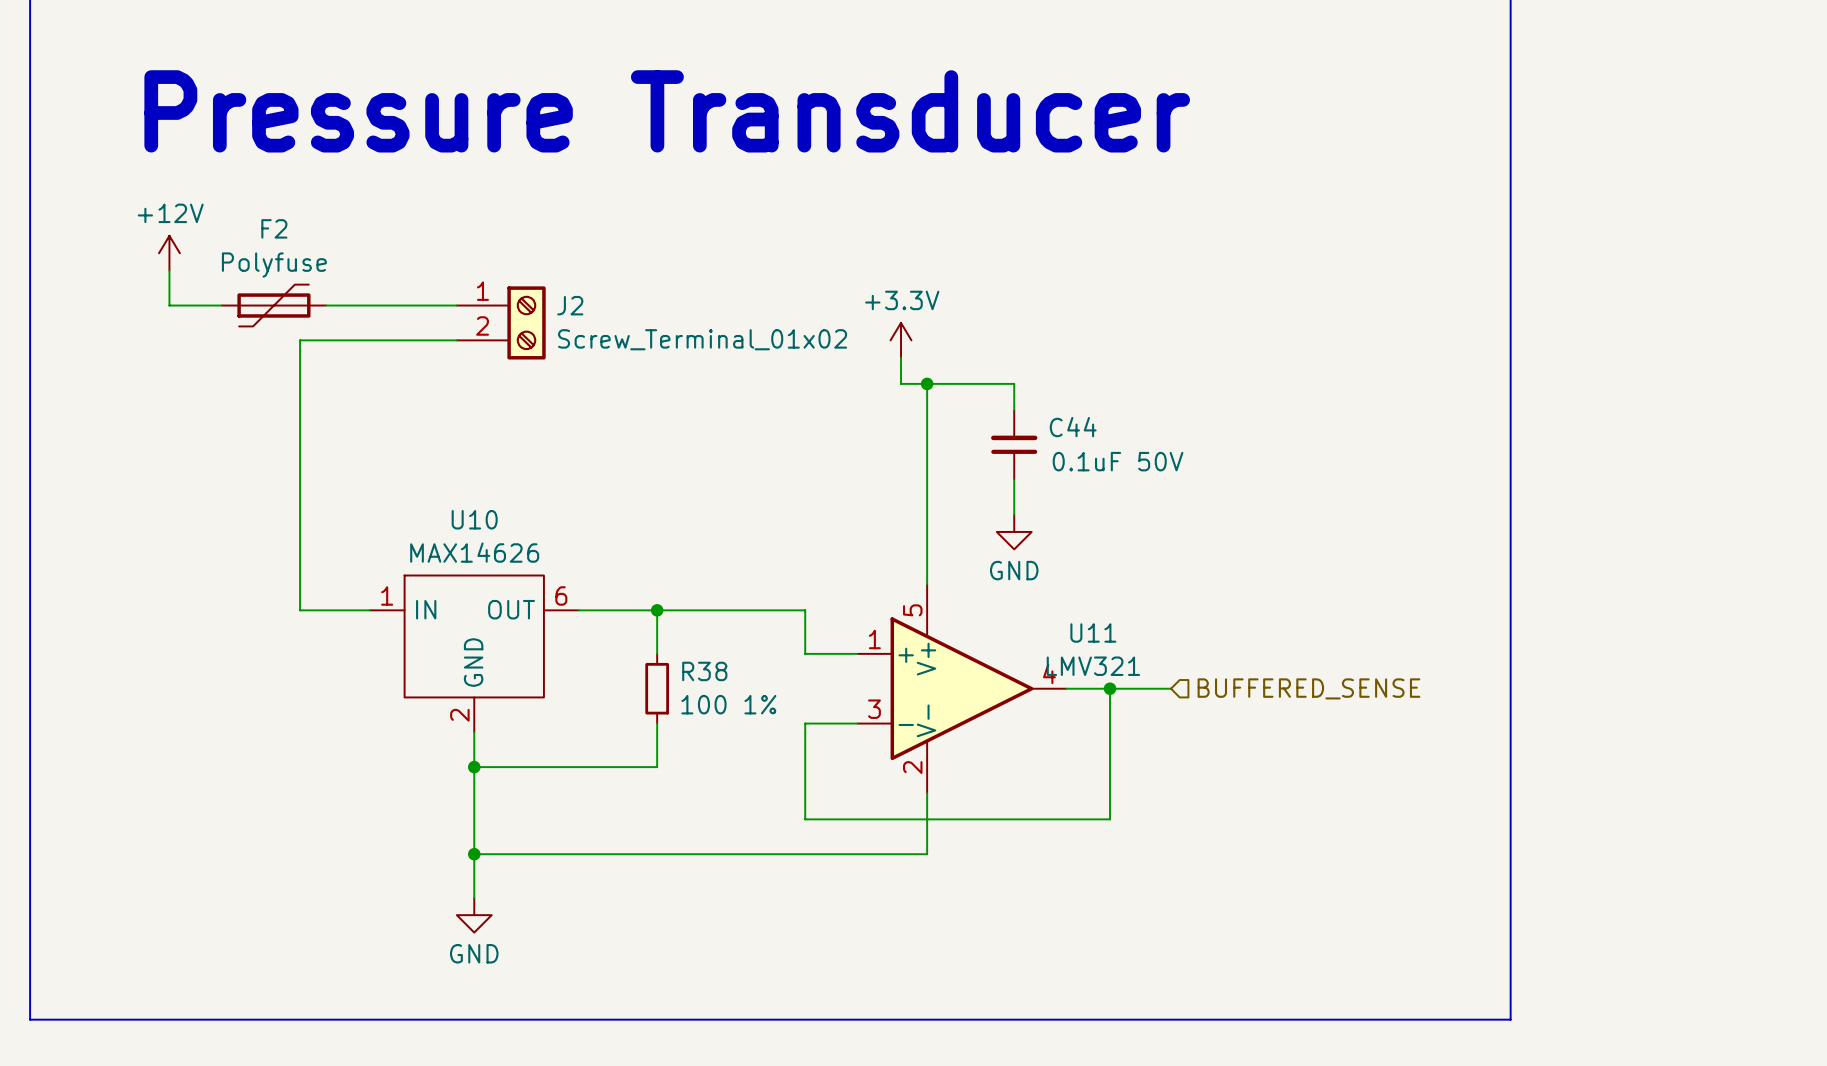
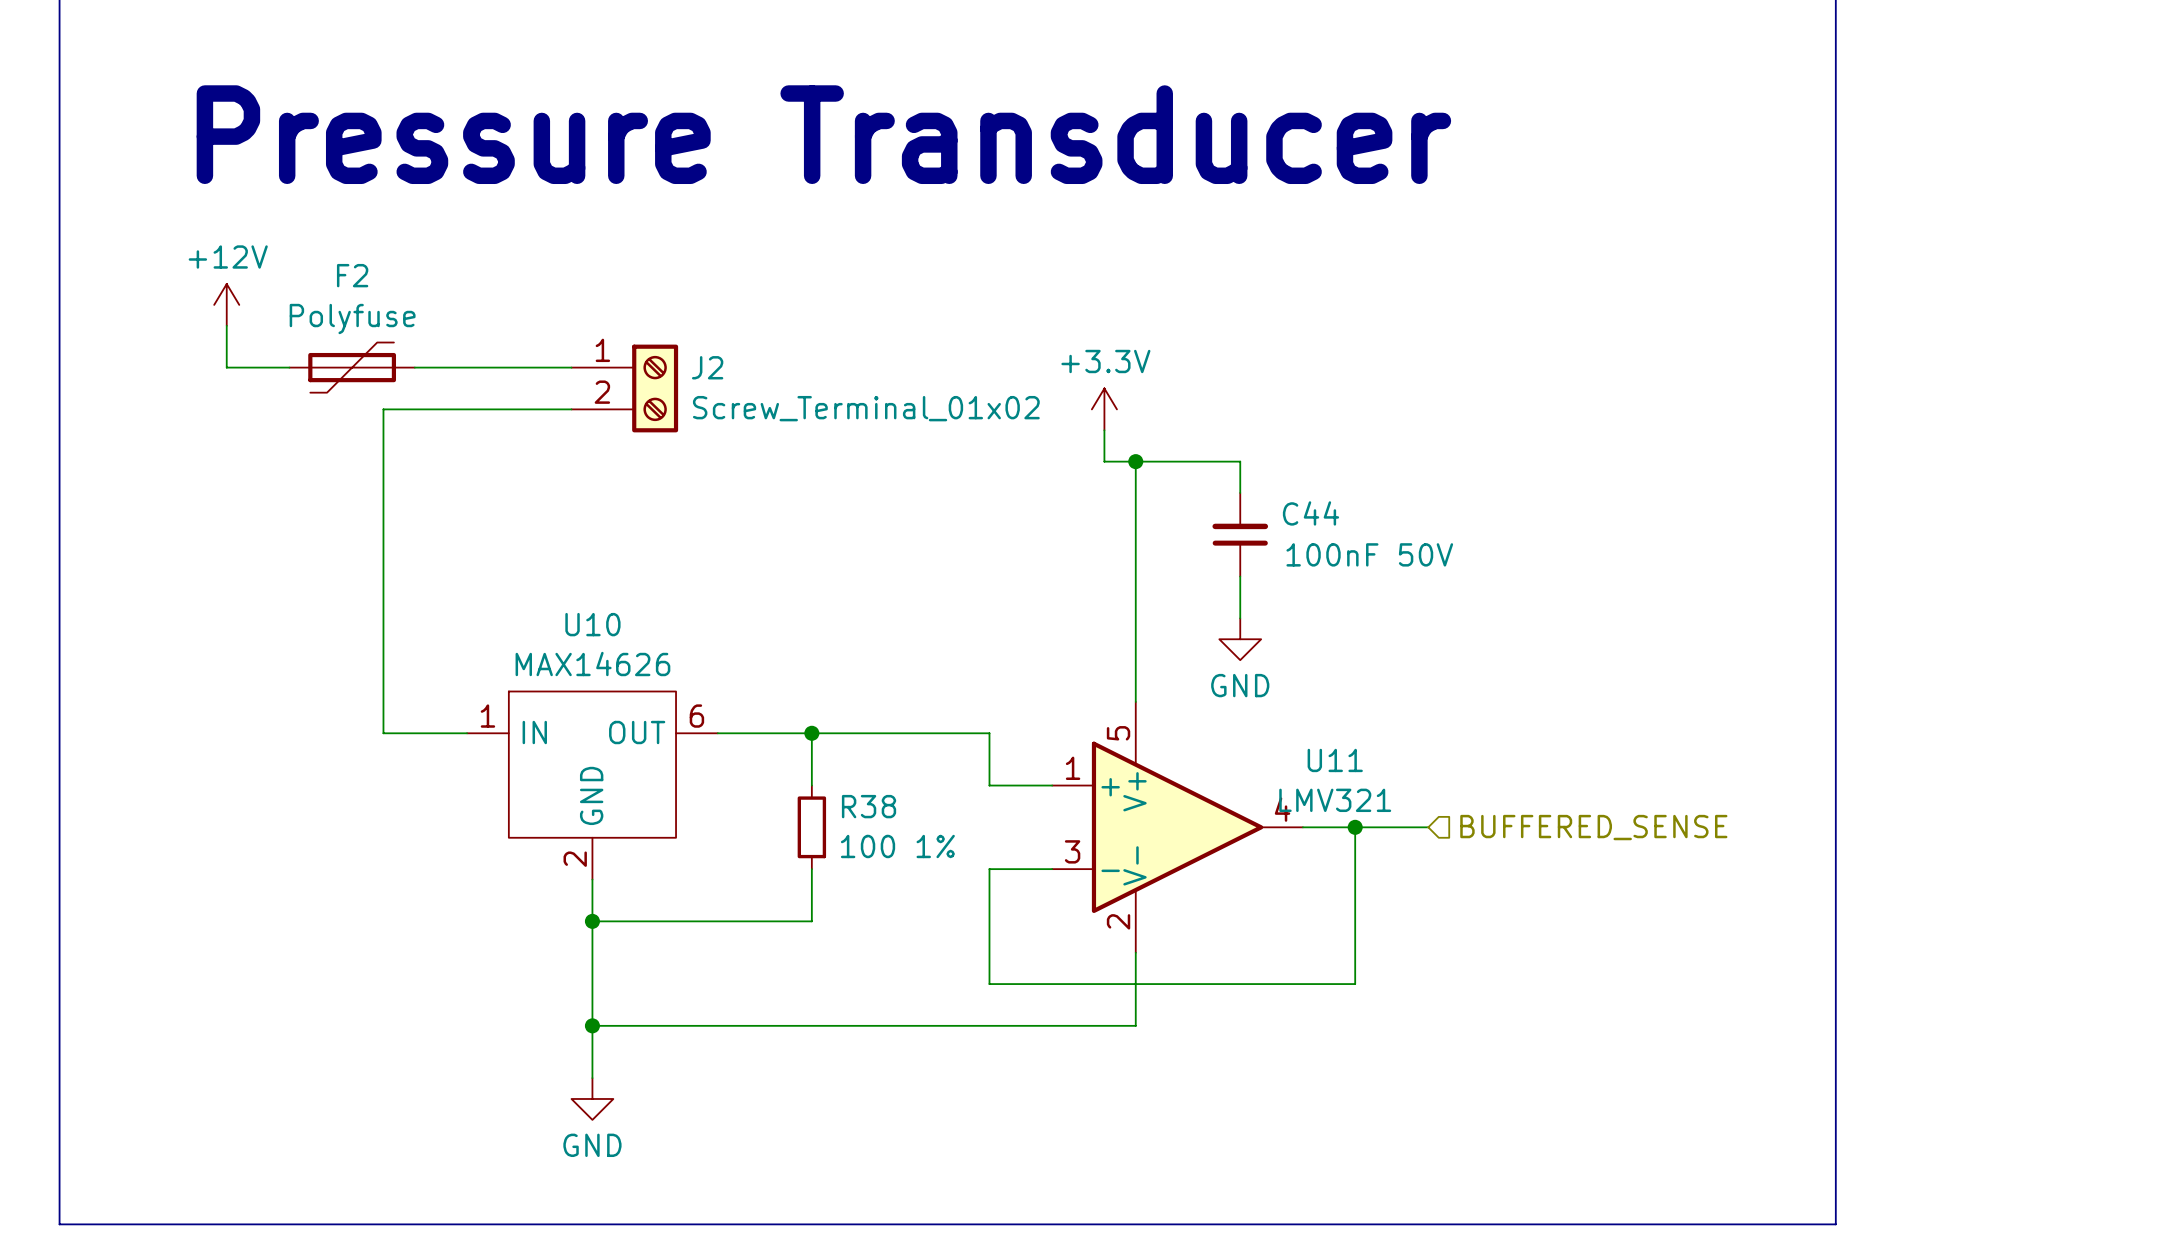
C44 value: 0.1uF 50V (1118, 461) -> 100nF 50V (1369, 554)

